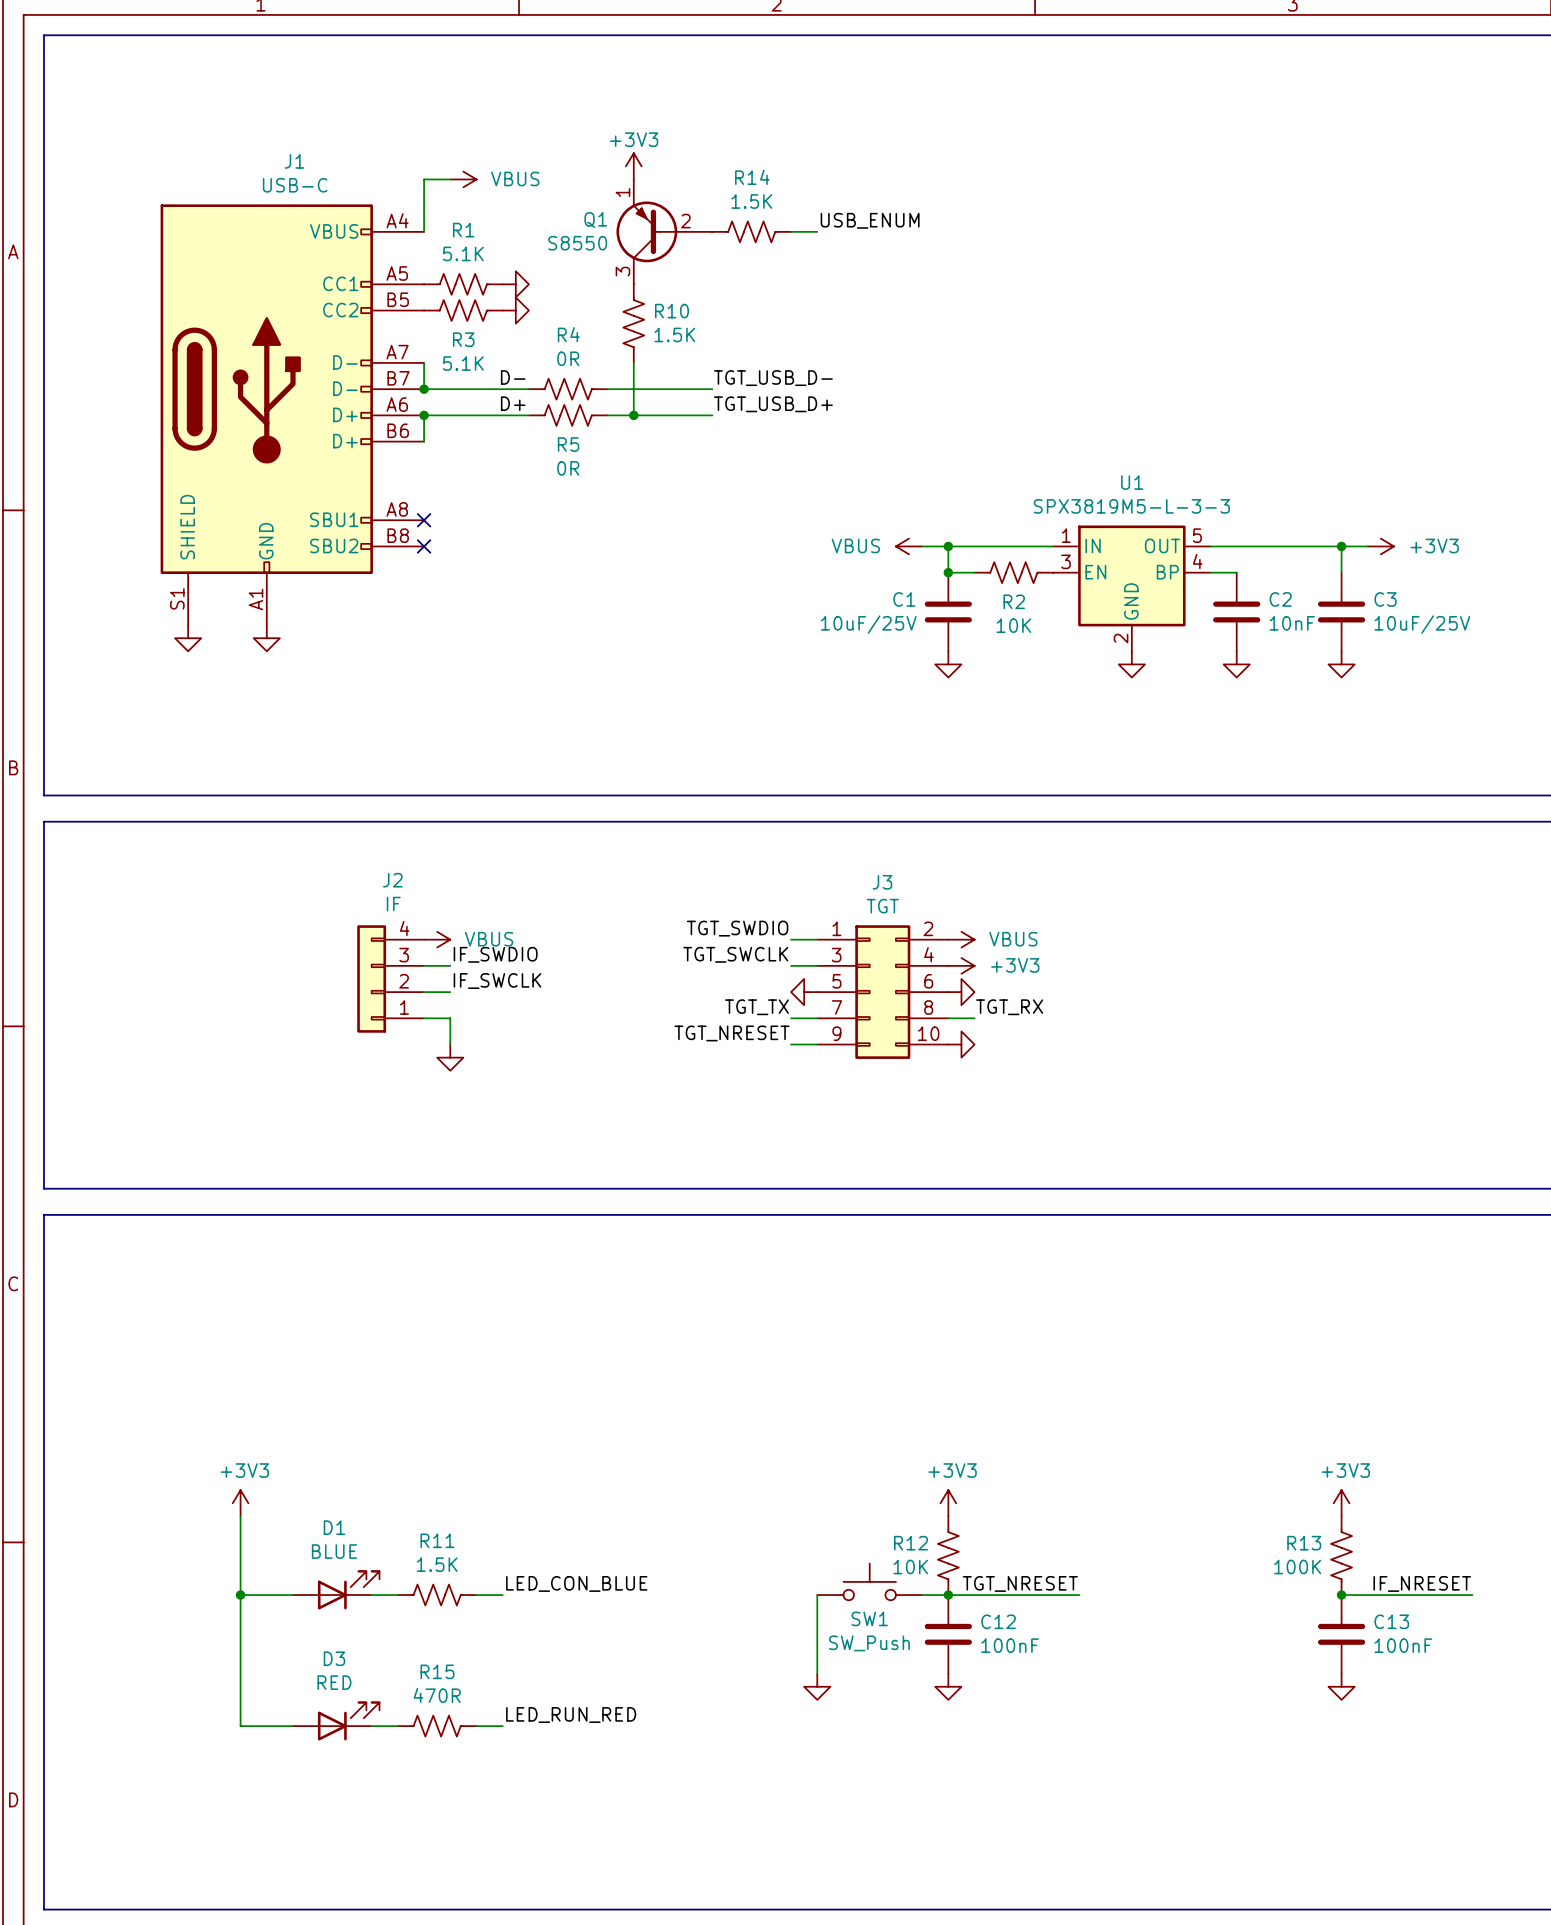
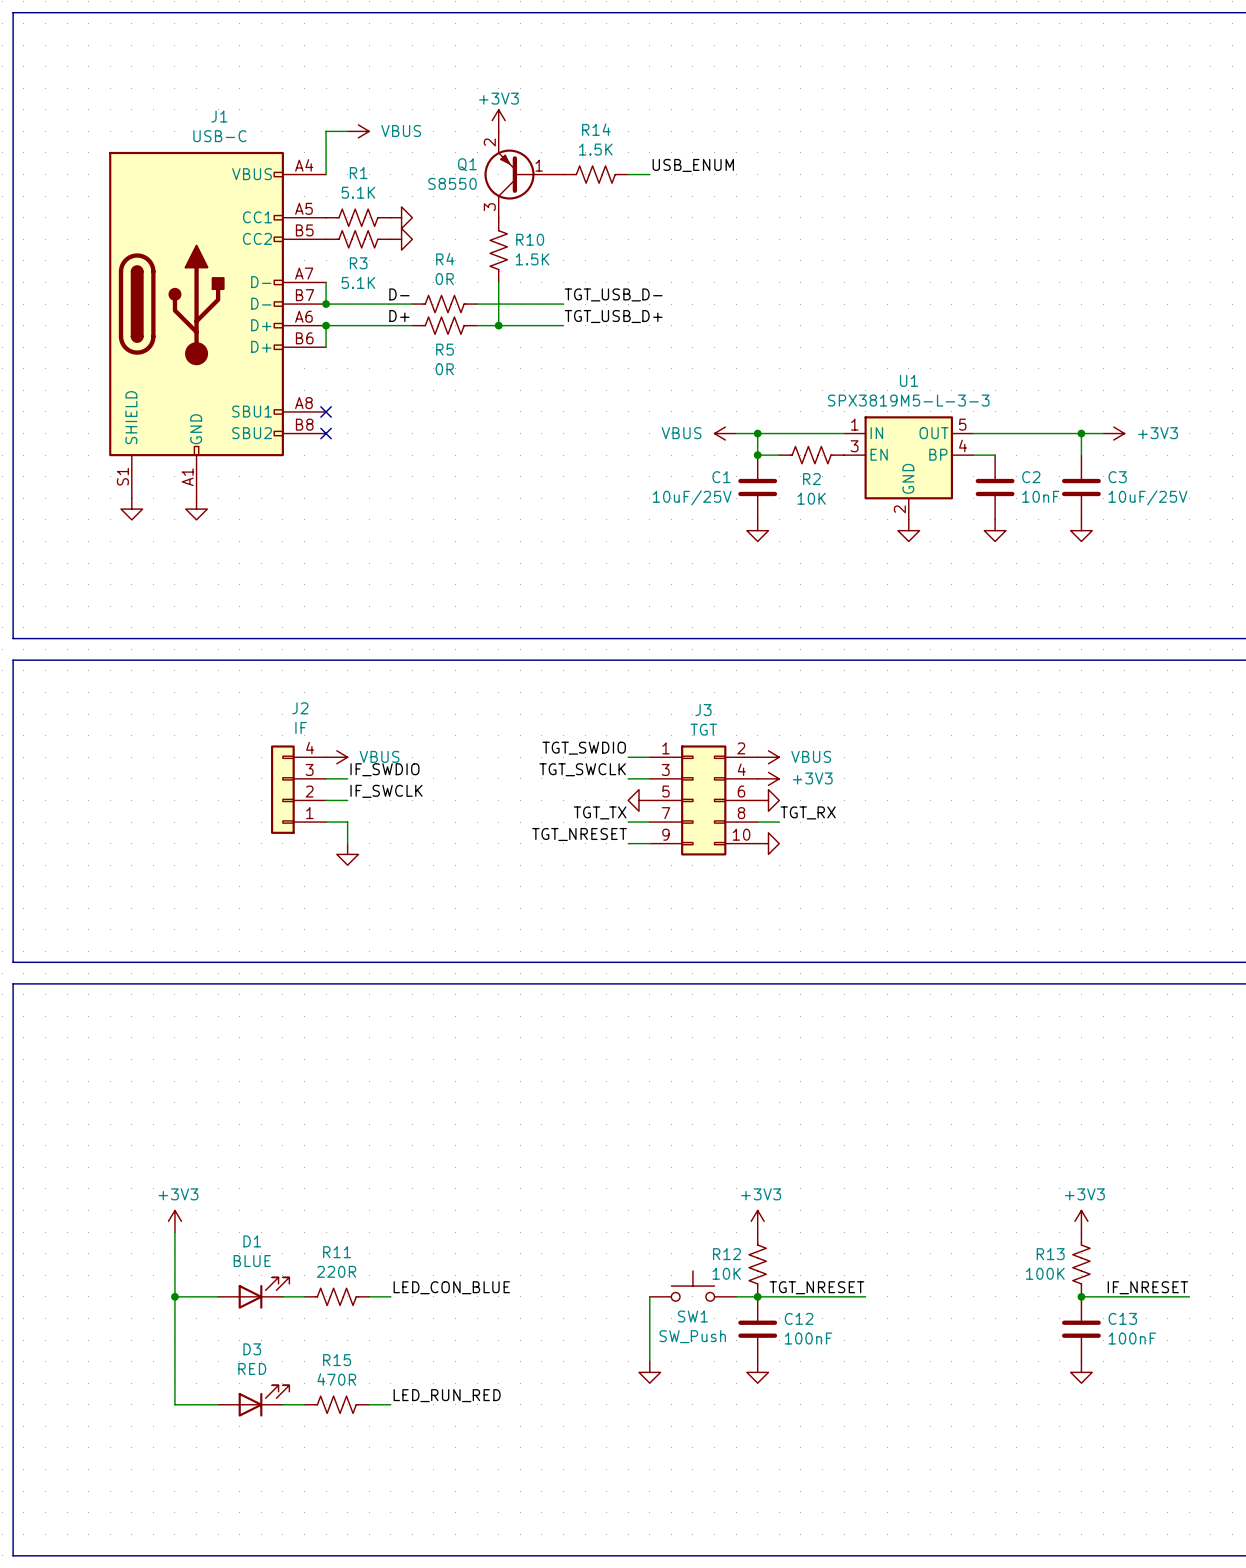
Q1 symbol: [616, 179, 713, 285] -> [484, 131, 564, 218]
R11 value: 1.5K (437, 1564) -> 220R (336, 1271)

